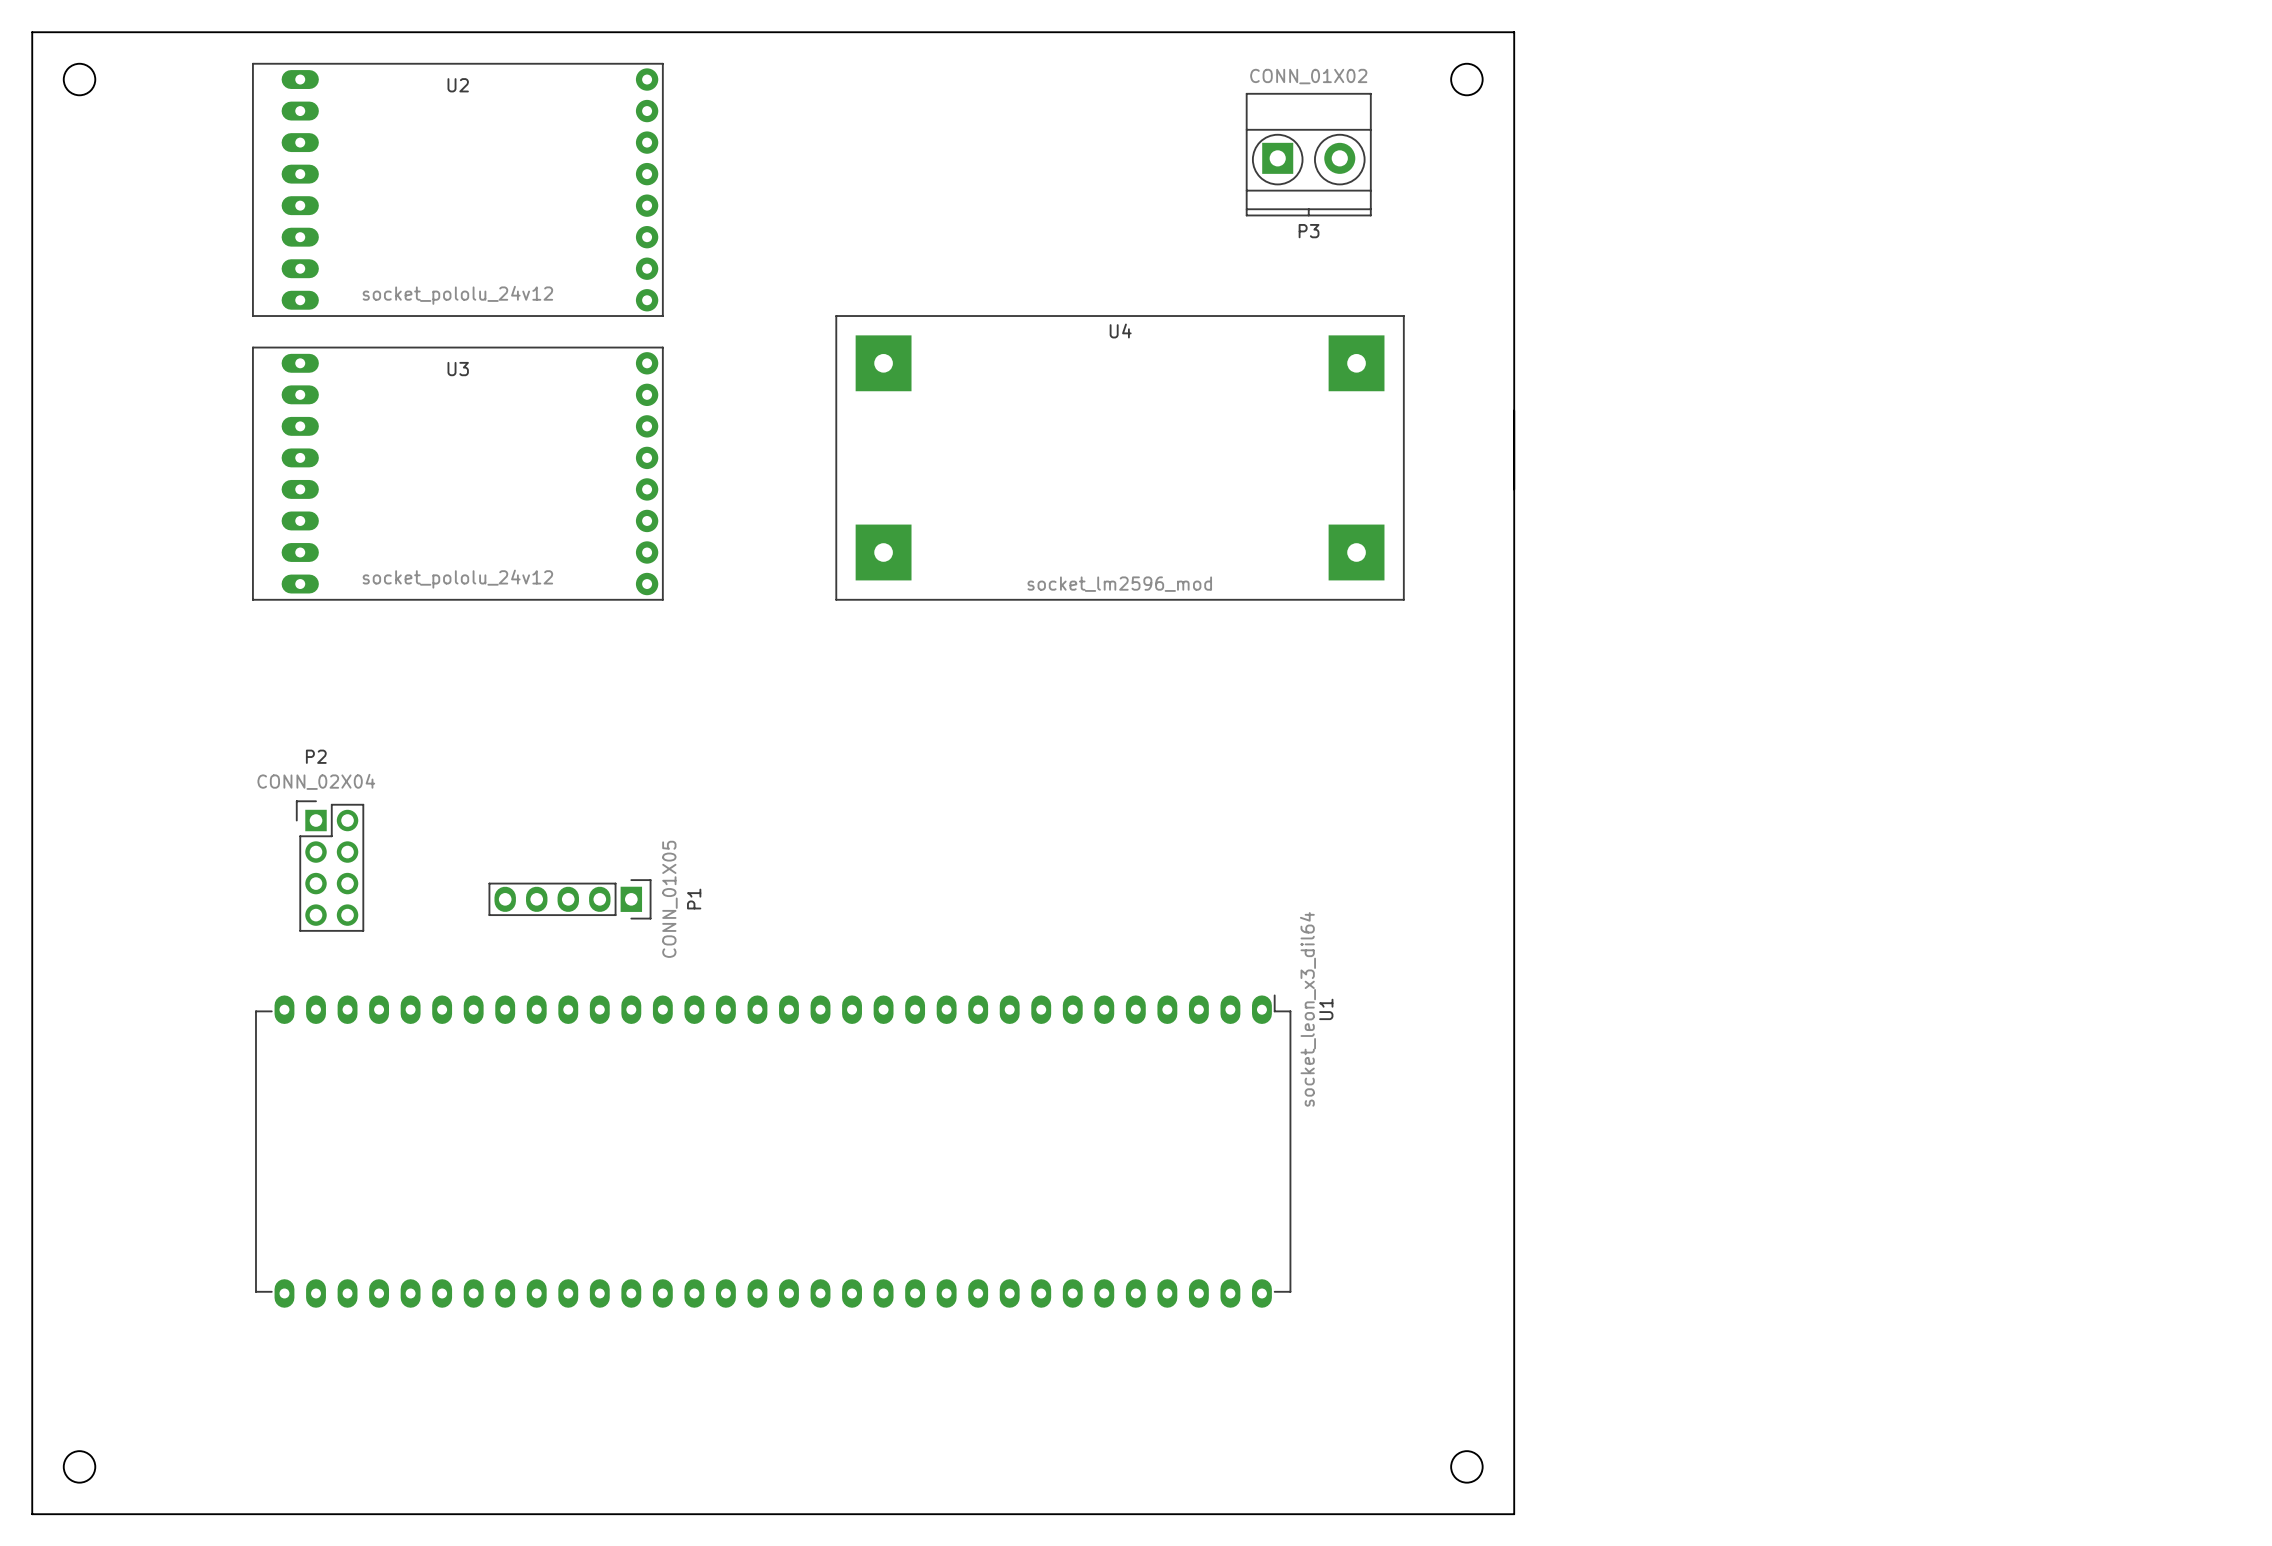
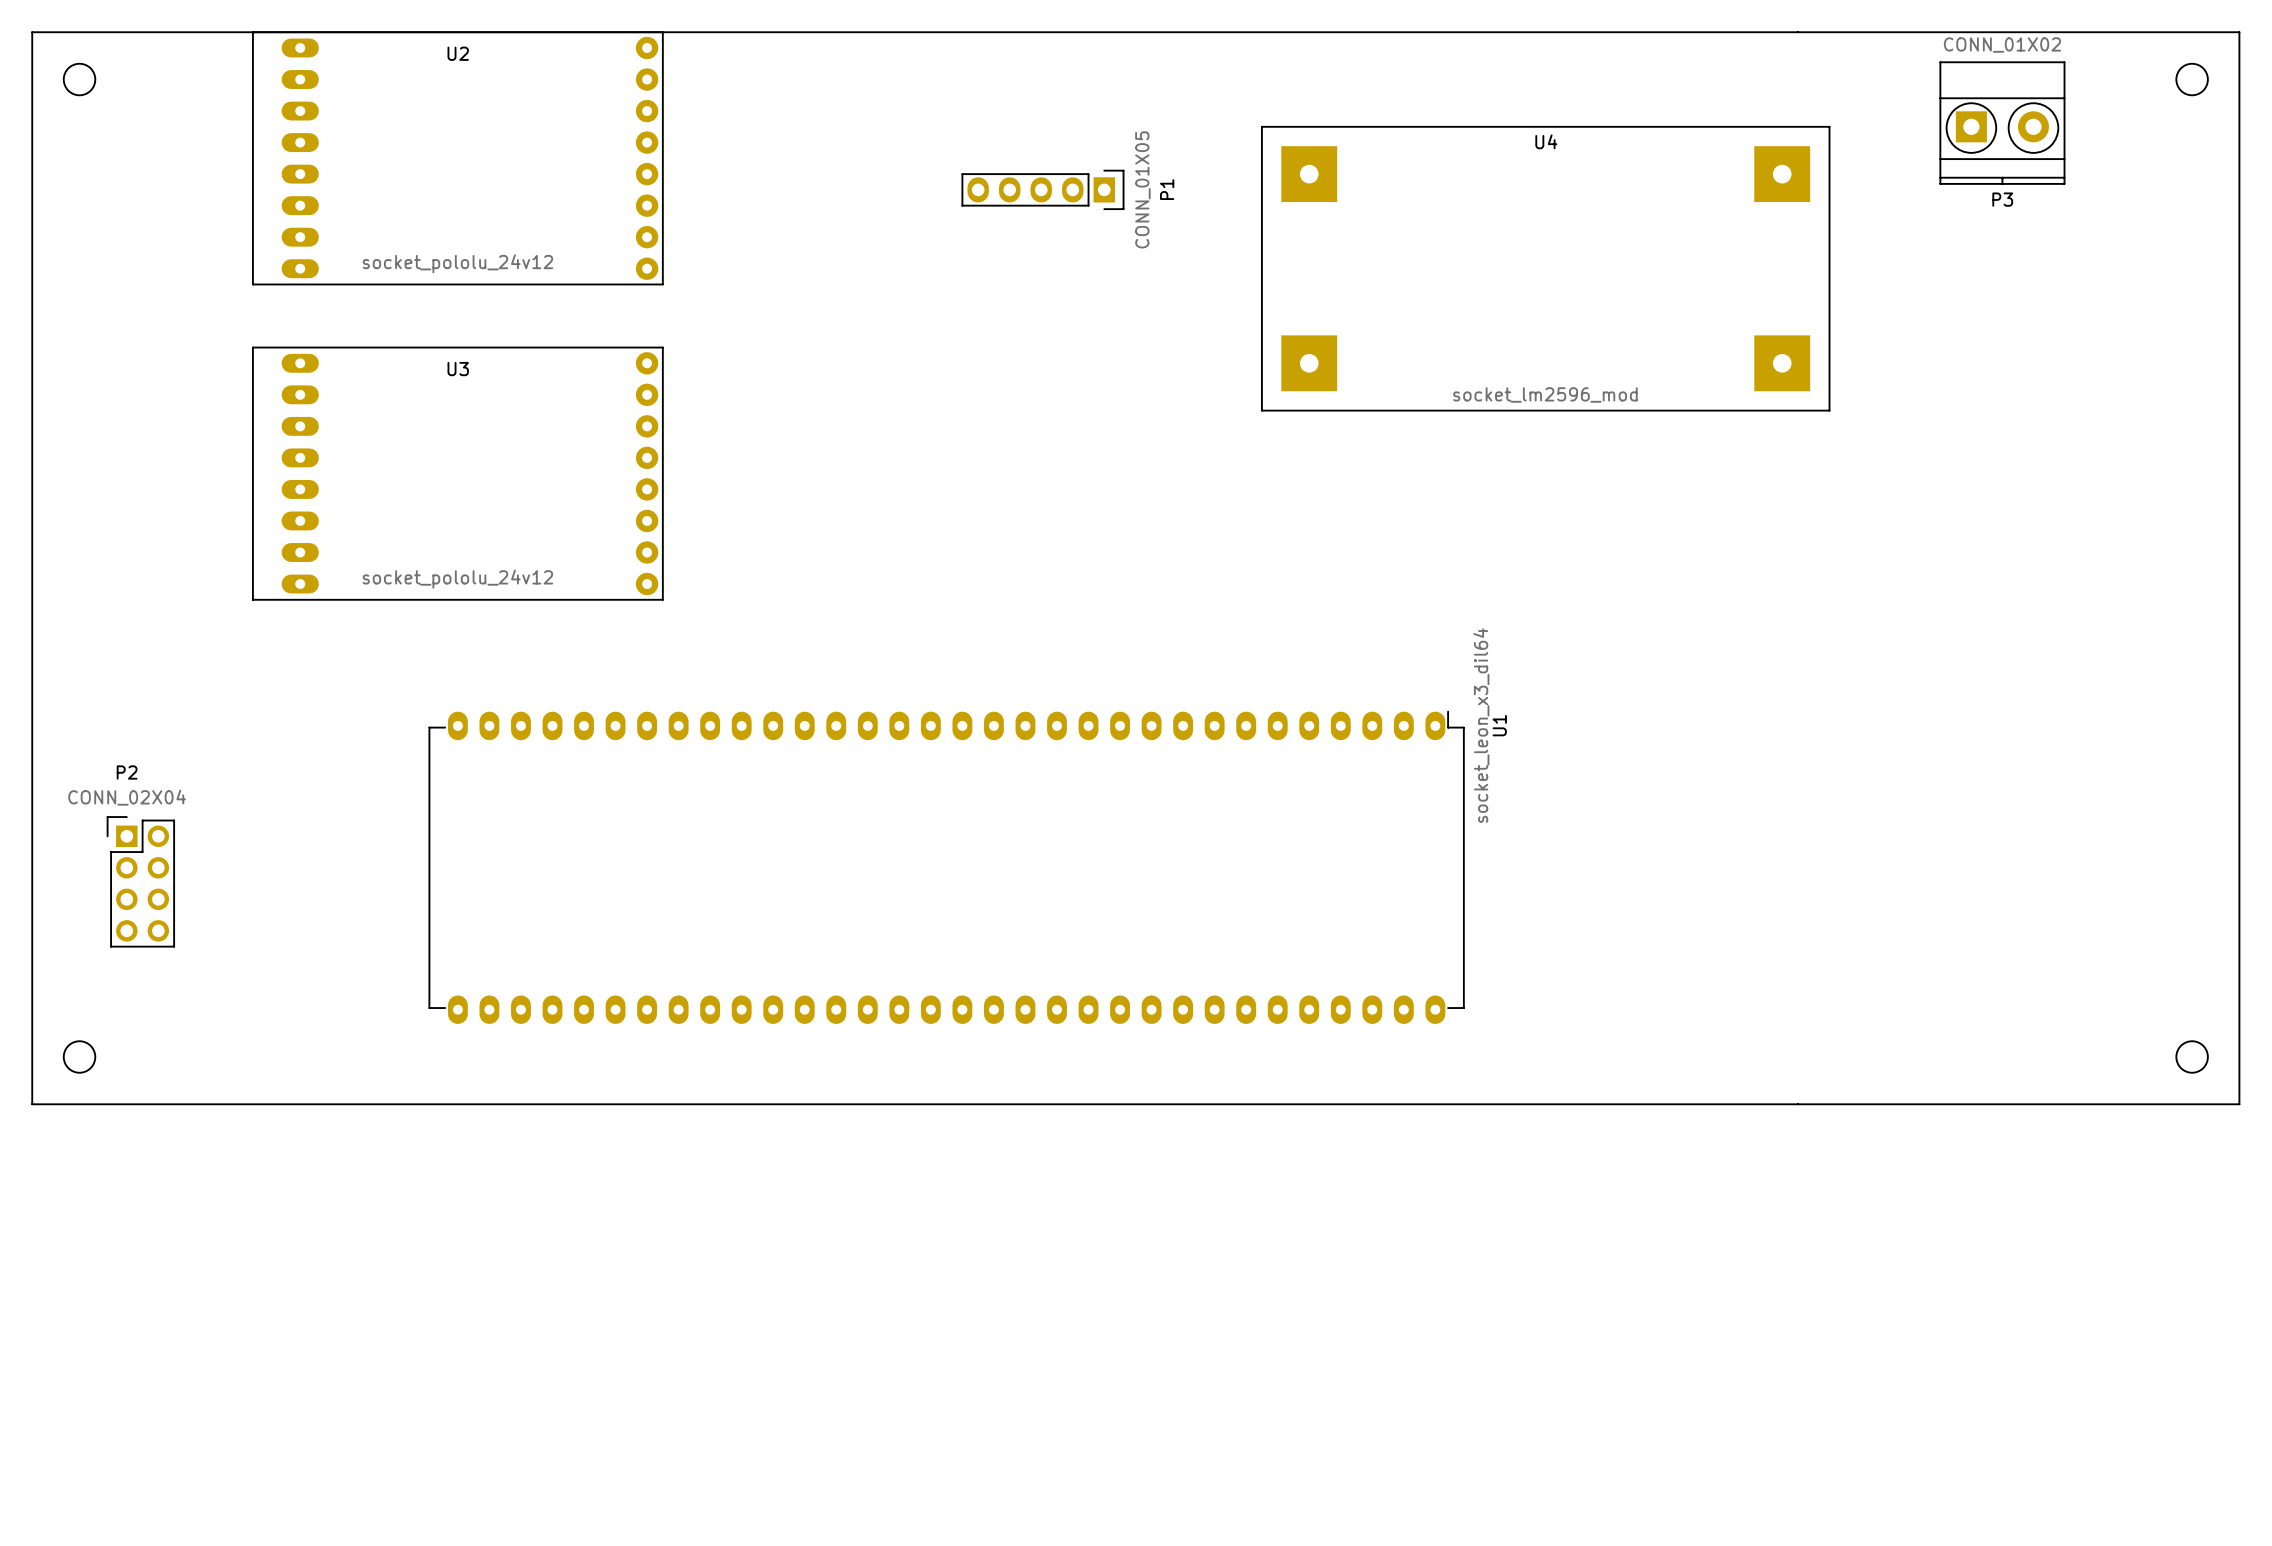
board edge: (1514, 32) (1514, 1514) (32, 1514) (32, 1104) -> (1514, 32) (2239, 32) (2239, 1104) (32, 1104)
round board edge: [1450, 62, 1484, 97] -> none
round board edge: none -> [2175, 62, 2209, 97]
P3 position: (1308, 154) -> (2002, 123)
U2 position: (457, 189) -> (457, 158)
U4 position: (1120, 457) -> (1545, 268)
P2 position: (330, 866) -> (140, 881)
P1 position: (570, 899) -> (1042, 189)
round board edge: none -> [62, 1040, 97, 1074]
round board edge: none -> [2175, 1040, 2209, 1074]
U1 position: (773, 1151) -> (946, 867)
round board edge: [62, 1450, 97, 1484] -> none
round board edge: [1450, 1450, 1484, 1484] -> none

